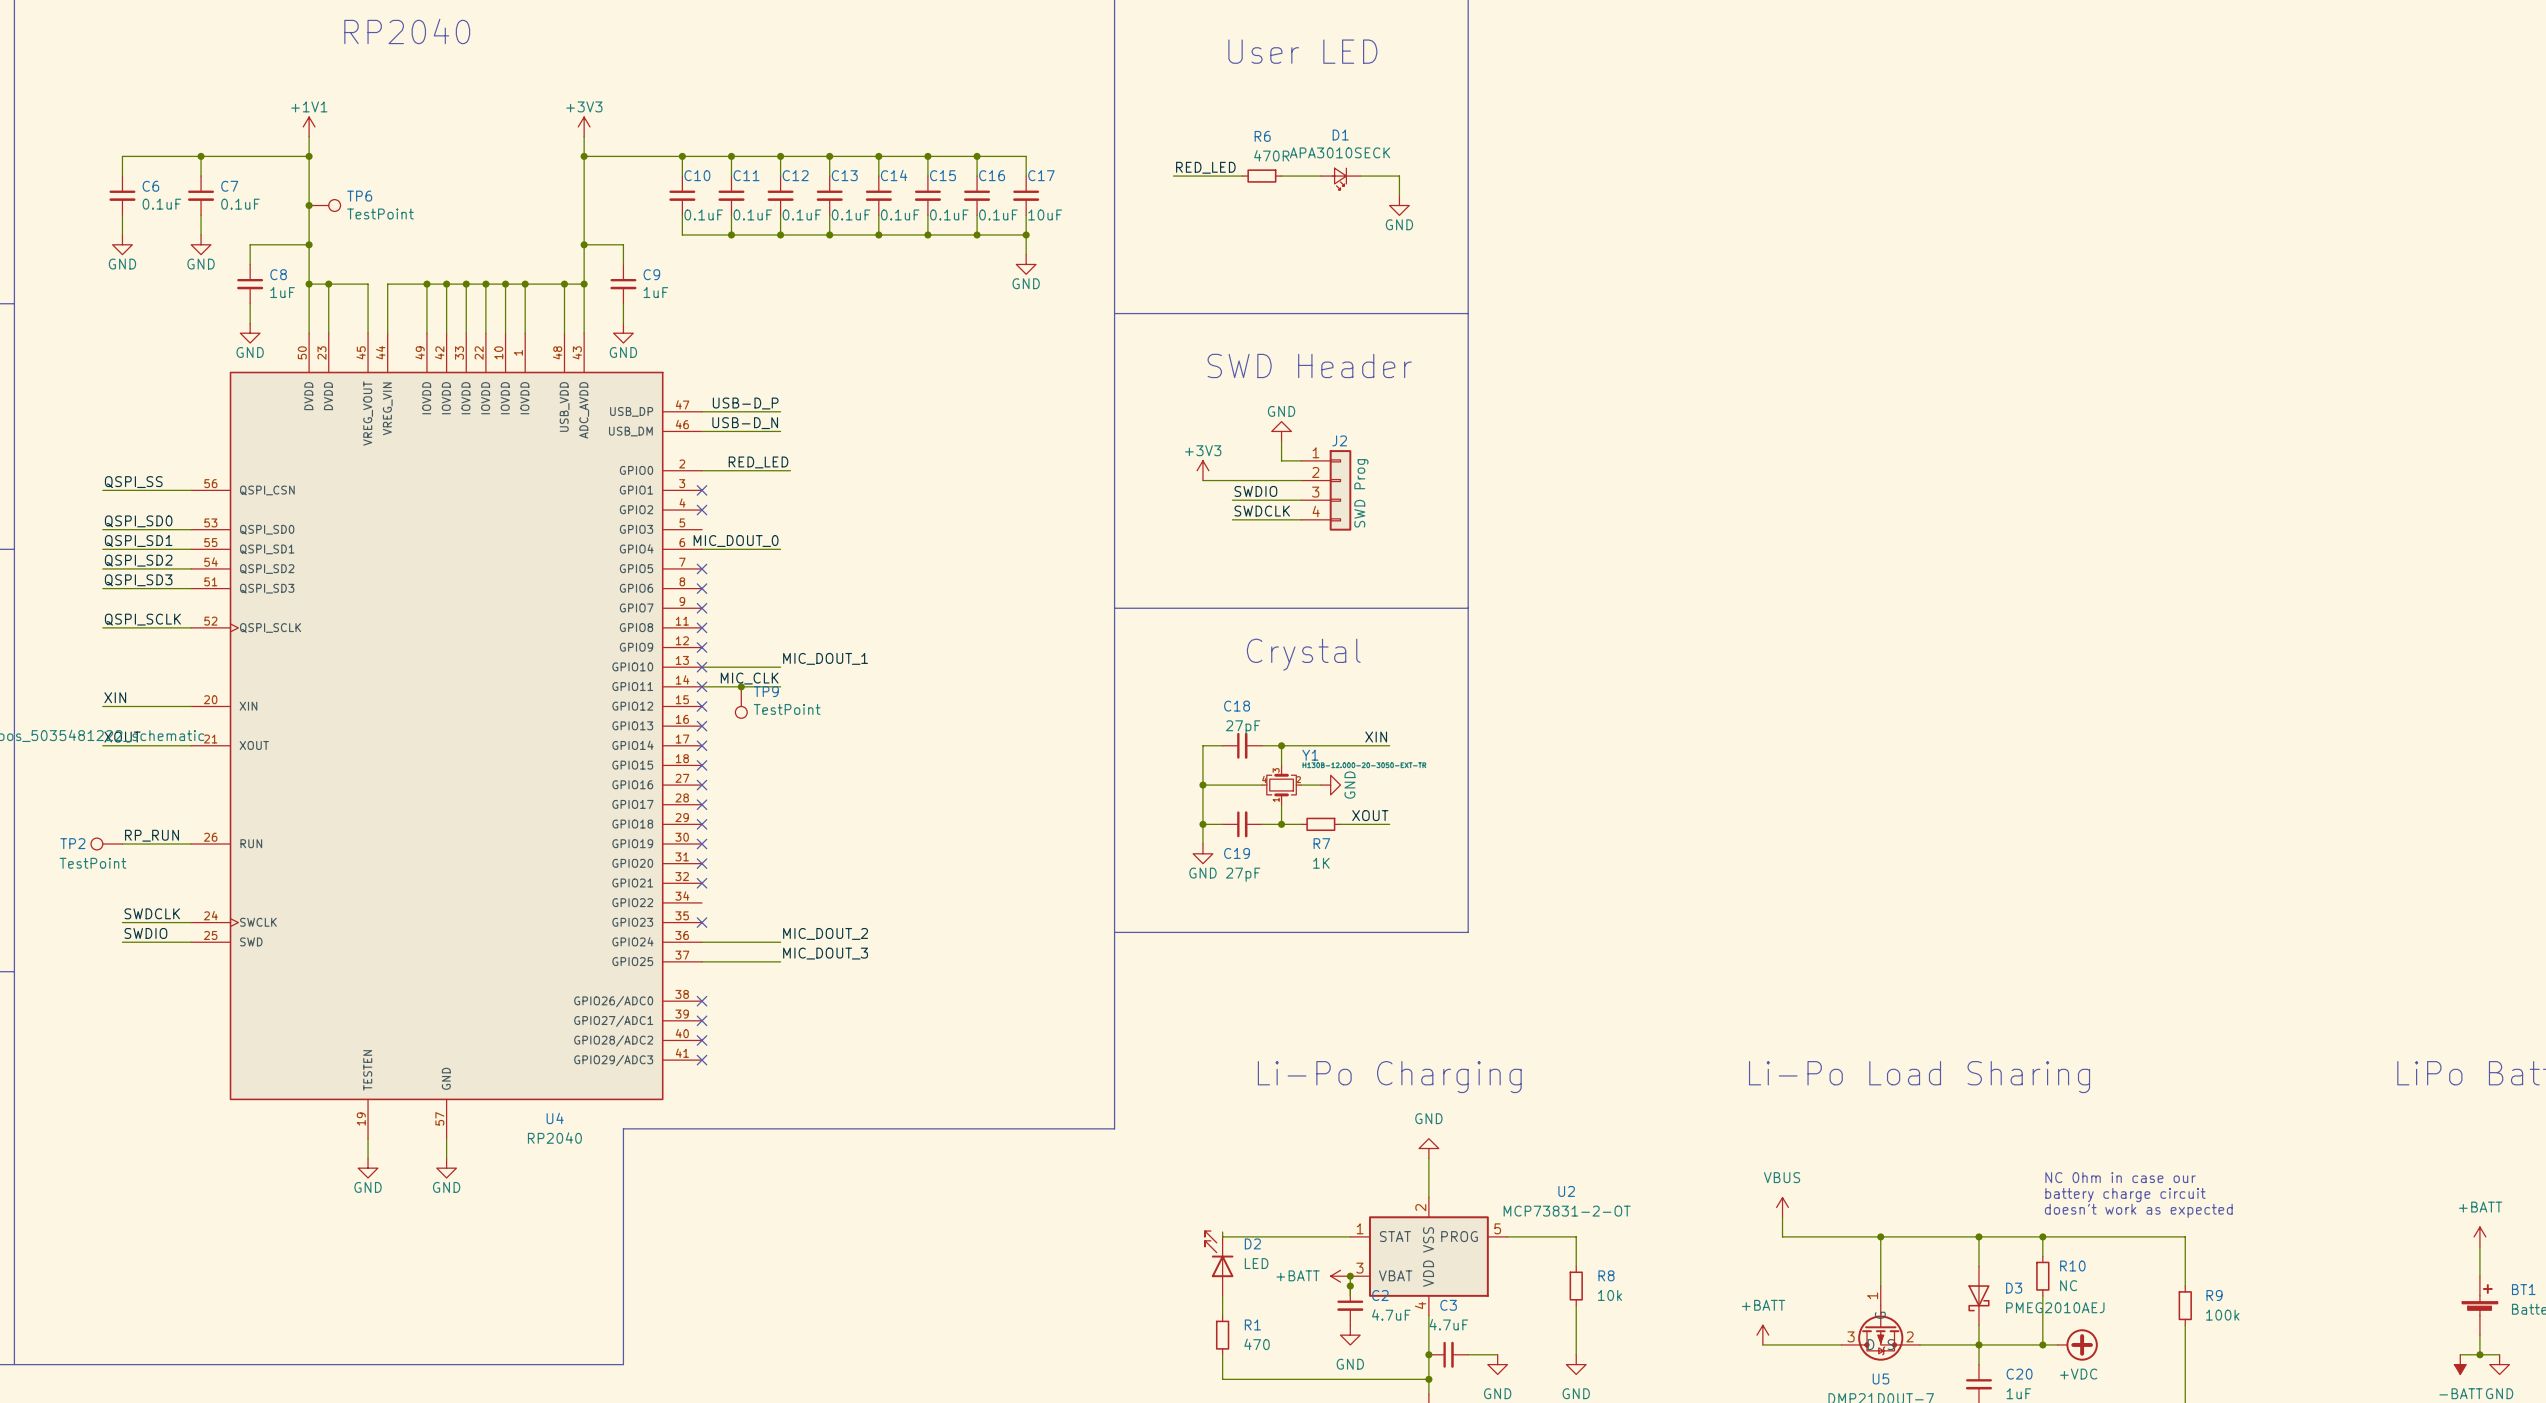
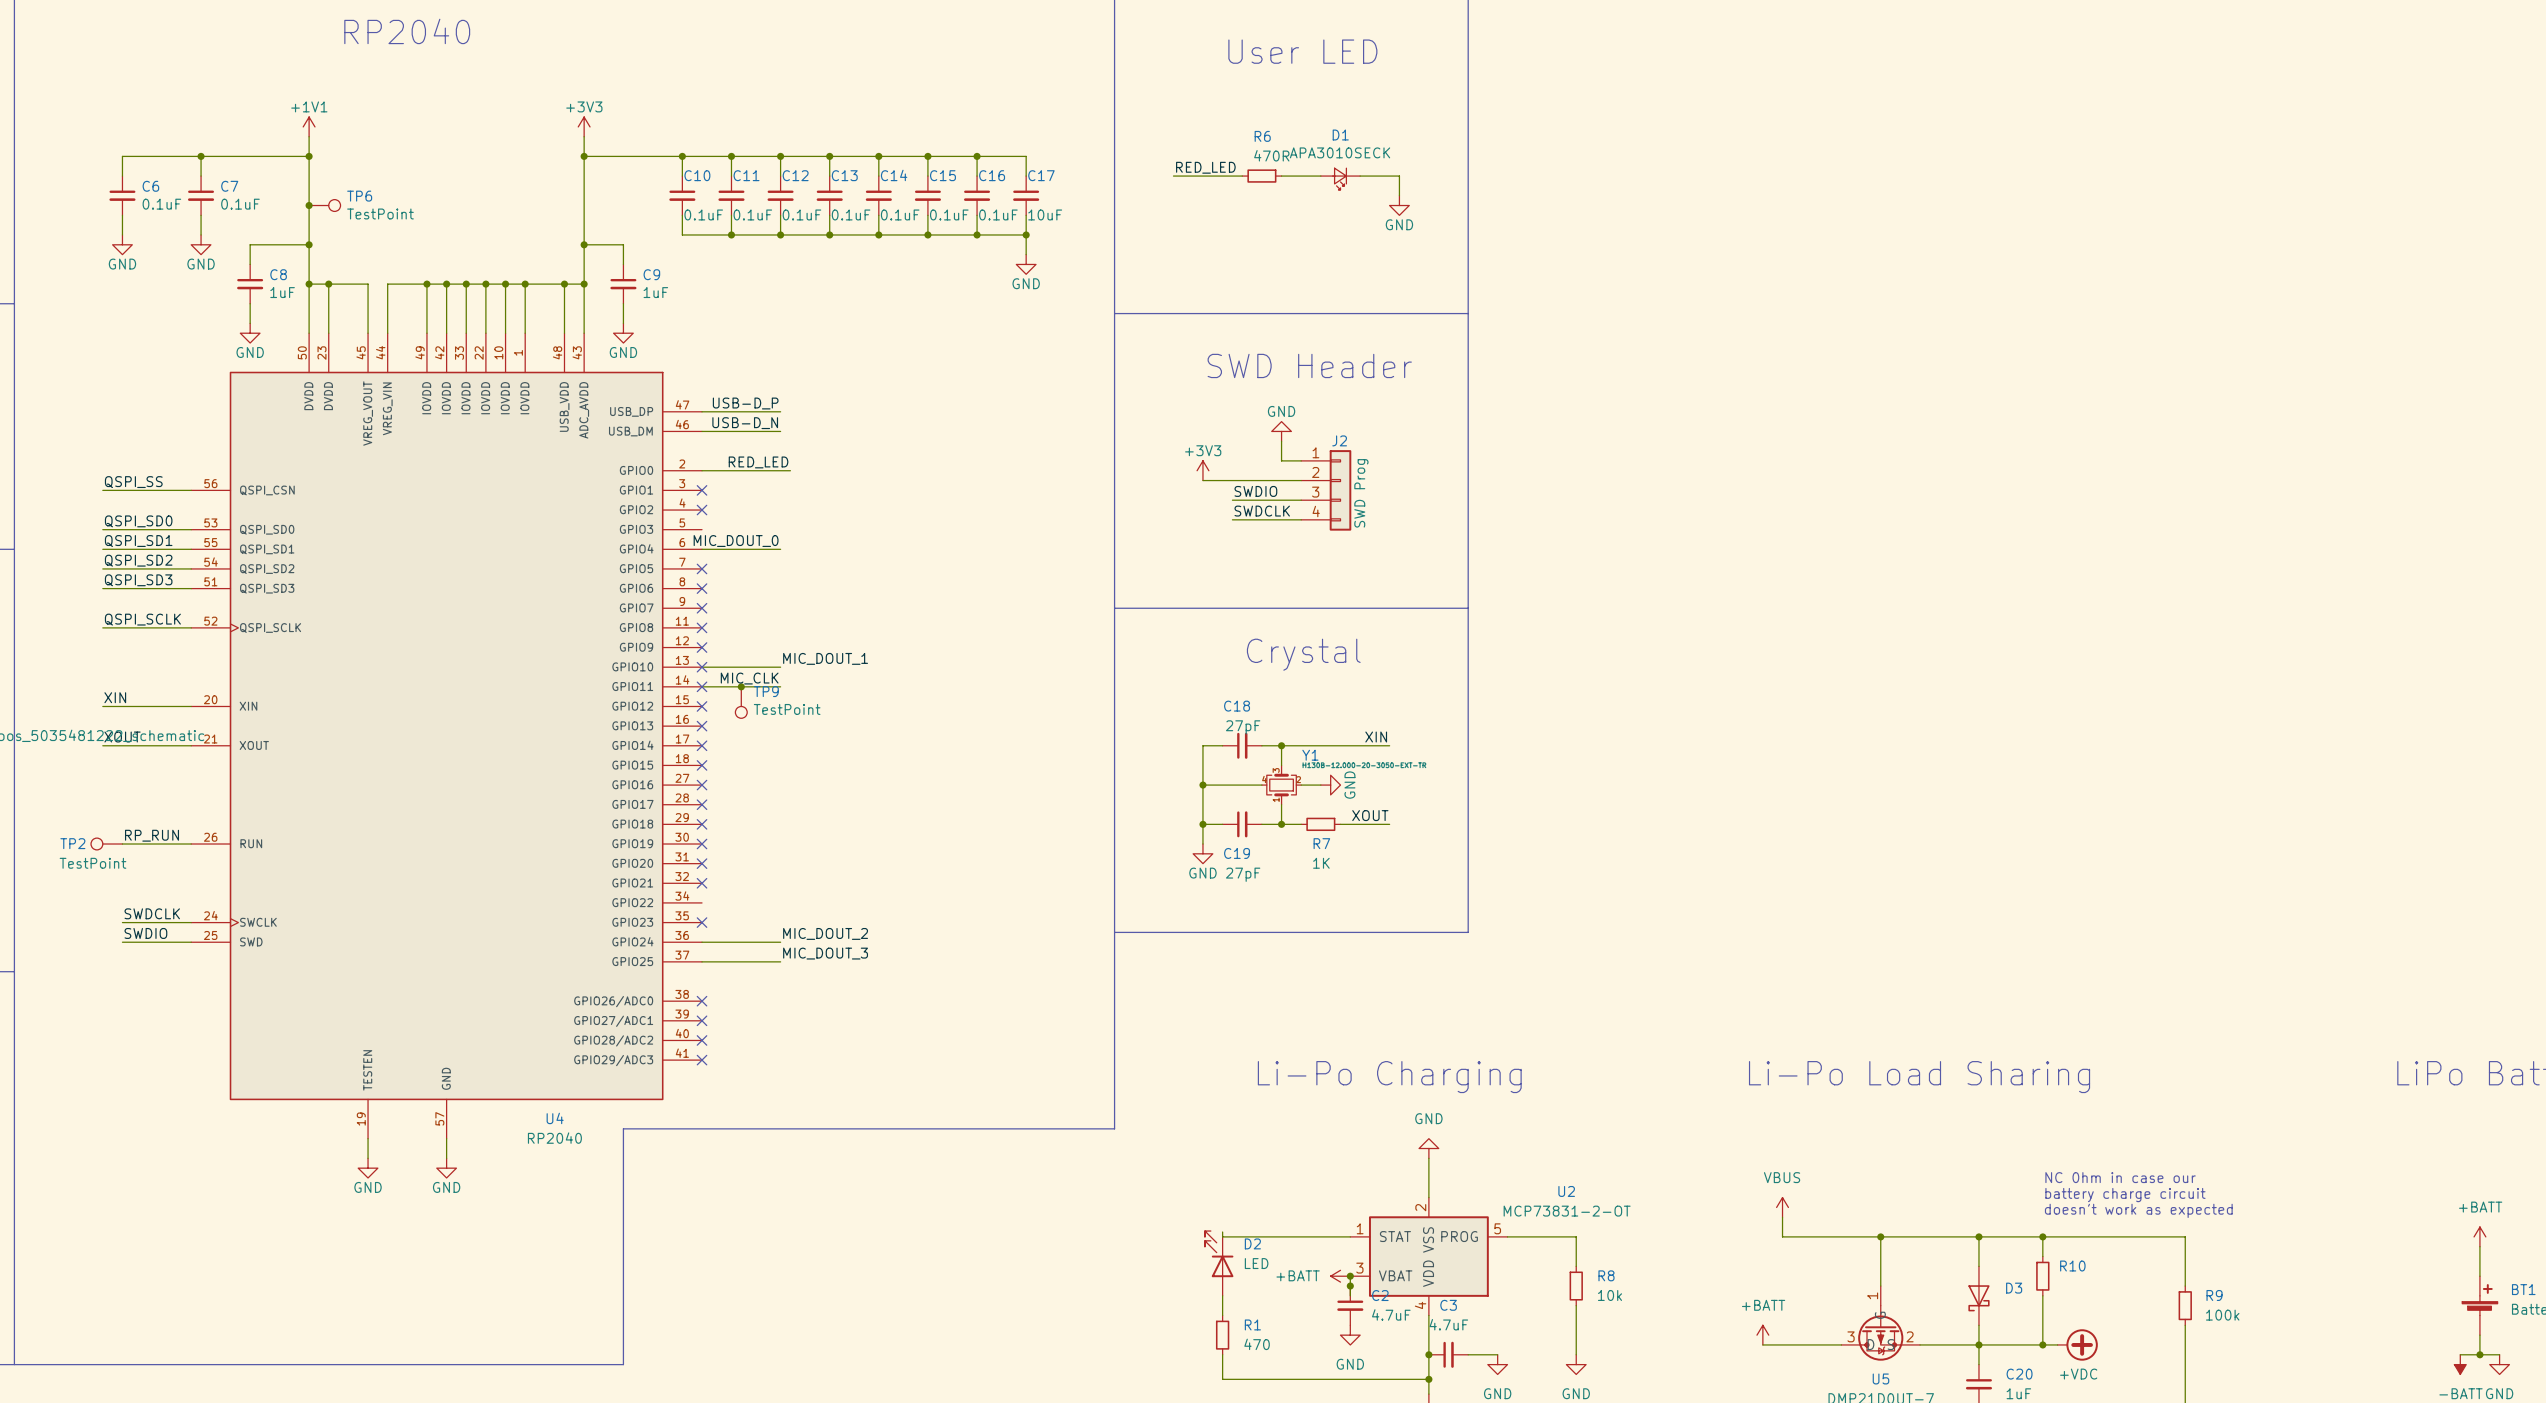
R10 value: NC (2068, 1285) -> none
D3 value: PMEG2010AEJ (2055, 1307) -> none

